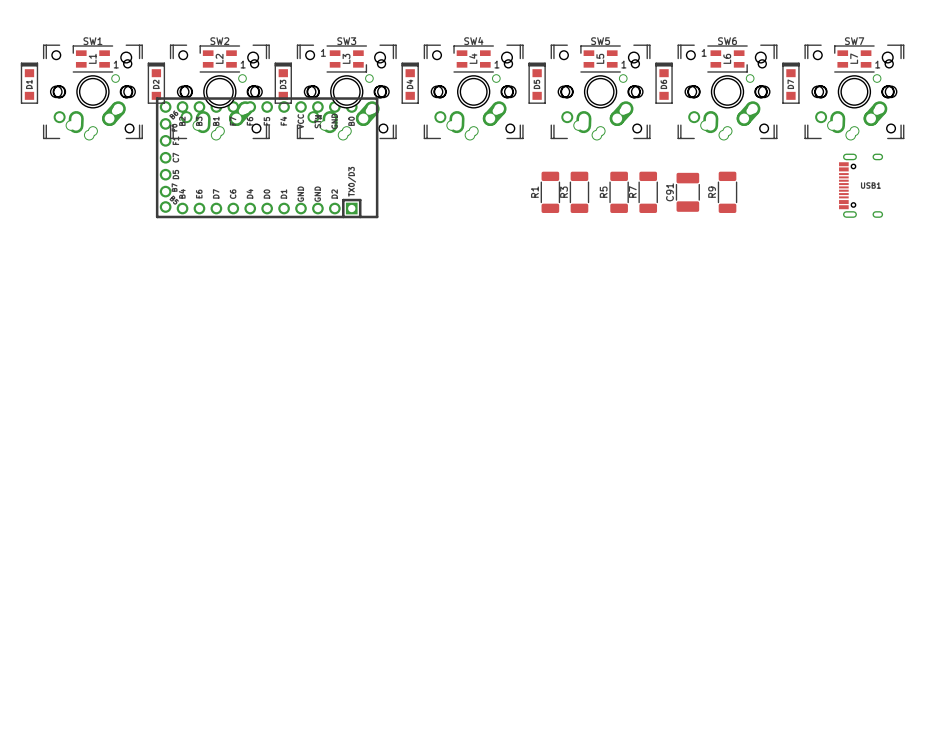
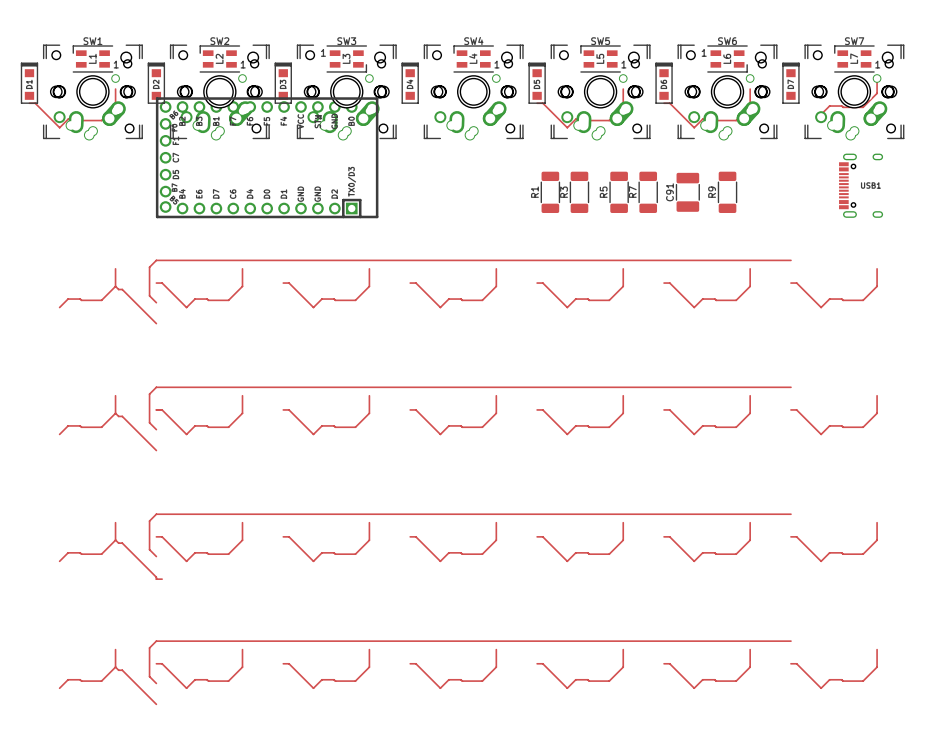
track: none -> (877, 75) (877, 93) (863, 107) (829, 106) (821, 114)
track: none -> (115, 89) (115, 106) (101, 120) (68, 119) (59, 127) (35, 103) (29, 103)
track: none -> (623, 89) (623, 106) (609, 120) (575, 119) (567, 127) (542, 103) (537, 103)
track: none -> (750, 89) (750, 106) (736, 120) (702, 119) (694, 127) (669, 103) (664, 103)
track: none -> (790, 260) (156, 260) (149, 267) (149, 295) (156, 302)
track: none -> (115, 268) (115, 286) (101, 300) (68, 299) (59, 307)
track: none -> (242, 268) (242, 286) (228, 300) (195, 299) (186, 307) (162, 283) (156, 283)
track: none -> (369, 268) (369, 286) (355, 300) (321, 299) (313, 307) (289, 283) (283, 283)
track: none -> (496, 268) (496, 286) (482, 300) (448, 299) (440, 307) (415, 283) (410, 283)
track: none -> (623, 268) (623, 286) (609, 300) (575, 299) (567, 307) (542, 283) (537, 283)
track: none -> (750, 268) (750, 286) (736, 300) (702, 299) (694, 307) (669, 283) (664, 283)
track: none -> (877, 268) (877, 286) (863, 300) (829, 299) (821, 307) (796, 283) (790, 283)
track: none -> (115, 286) (118, 289) (122, 289) (156, 323)
track: none -> (790, 387) (156, 387) (149, 394) (149, 422) (156, 429)
track: none -> (115, 395) (115, 413) (101, 427) (68, 425) (59, 434)
track: none -> (242, 395) (242, 413) (228, 427) (195, 425) (186, 434) (162, 409) (156, 409)
track: none -> (369, 395) (369, 413) (355, 427) (321, 425) (313, 434) (289, 409) (283, 409)
track: none -> (496, 395) (496, 413) (482, 427) (448, 425) (440, 434) (415, 409) (410, 409)
track: none -> (623, 395) (623, 413) (609, 427) (575, 425) (567, 434) (542, 409) (537, 409)
track: none -> (750, 395) (750, 413) (736, 427) (702, 425) (694, 434) (669, 409) (664, 409)
track: none -> (877, 395) (877, 413) (863, 427) (829, 425) (821, 434) (796, 409) (790, 409)
track: none -> (115, 413) (118, 416) (122, 416) (156, 450)
track: none -> (790, 514) (156, 514) (149, 521) (149, 549) (156, 556)
track: none -> (115, 522) (115, 540) (101, 554) (68, 552) (59, 561)
track: none -> (242, 522) (242, 540) (228, 554) (195, 552) (186, 561) (162, 536) (156, 536)
track: none -> (369, 522) (369, 540) (355, 554) (321, 552) (313, 561) (289, 536) (283, 536)
track: none -> (496, 522) (496, 540) (482, 554) (448, 552) (440, 561) (415, 536) (410, 536)
track: none -> (623, 522) (623, 540) (609, 554) (575, 552) (567, 561) (542, 536) (537, 536)
track: none -> (750, 522) (750, 540) (736, 554) (702, 552) (694, 561) (669, 536) (664, 536)
track: none -> (877, 522) (877, 540) (863, 554) (829, 552) (821, 561) (796, 536) (790, 536)
track: none -> (115, 540) (118, 543) (122, 543) (156, 577)
track: none -> (156, 577) (156, 579) (162, 579)
track: none -> (790, 641) (156, 641) (149, 647) (149, 676) (156, 683)
track: none -> (115, 649) (115, 667) (101, 681) (68, 679) (59, 688)
track: none -> (242, 649) (242, 667) (228, 681) (195, 679) (186, 688) (162, 663) (156, 663)
track: none -> (369, 649) (369, 667) (355, 681) (321, 679) (313, 688) (289, 663) (283, 663)
track: none -> (496, 649) (496, 667) (482, 681) (448, 679) (440, 688) (415, 663) (410, 663)
track: none -> (623, 649) (623, 667) (609, 681) (575, 679) (567, 688) (542, 663) (537, 663)
track: none -> (750, 649) (750, 667) (736, 681) (702, 679) (694, 688) (669, 663) (664, 663)
track: none -> (877, 649) (877, 667) (863, 681) (829, 679) (821, 688) (796, 663) (790, 663)
track: none -> (115, 667) (118, 670) (122, 670) (156, 704)

